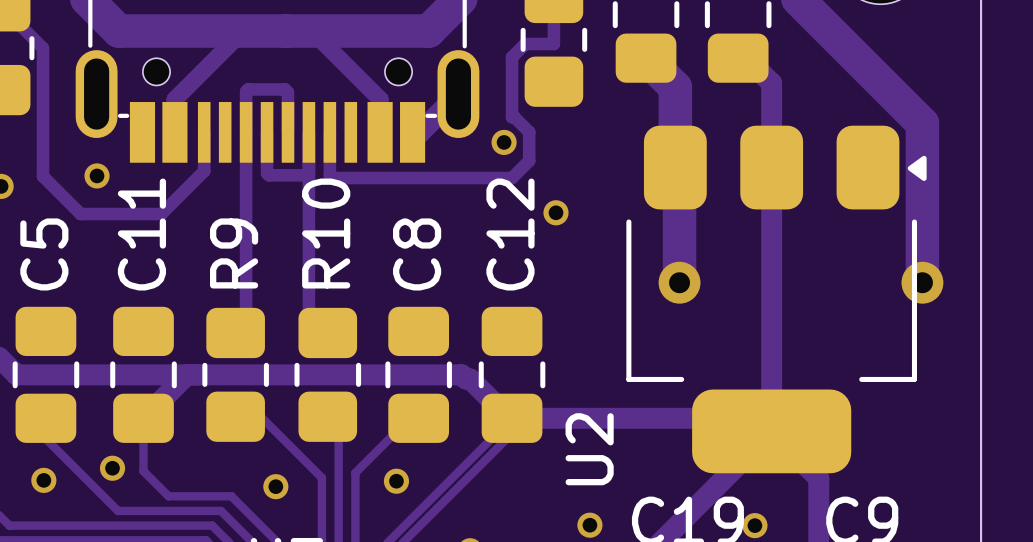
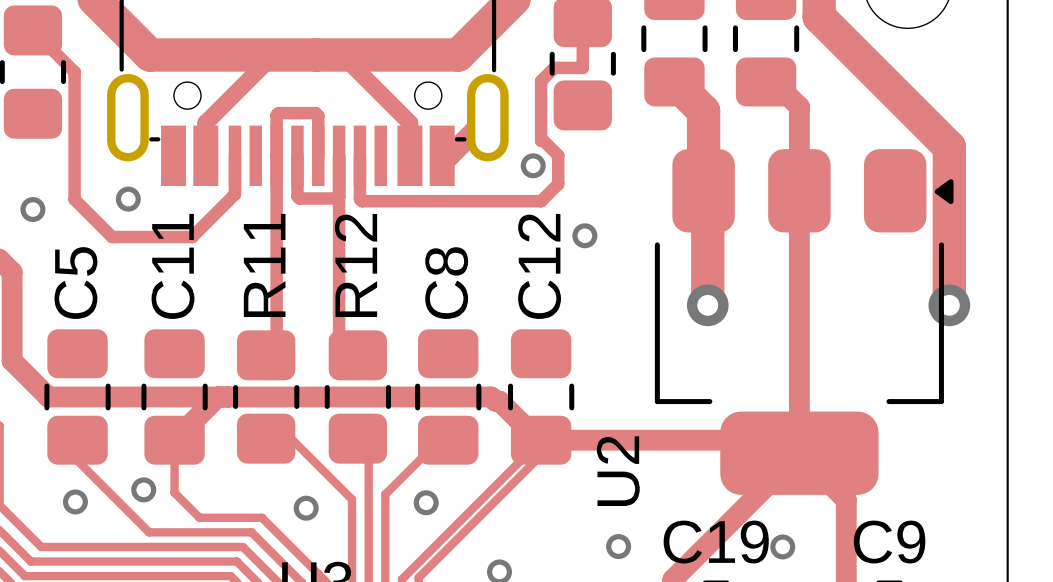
R10 name: R10 (326, 233) -> R12 (355, 265)
R9 name: R9 (234, 253) -> R11 (264, 265)

